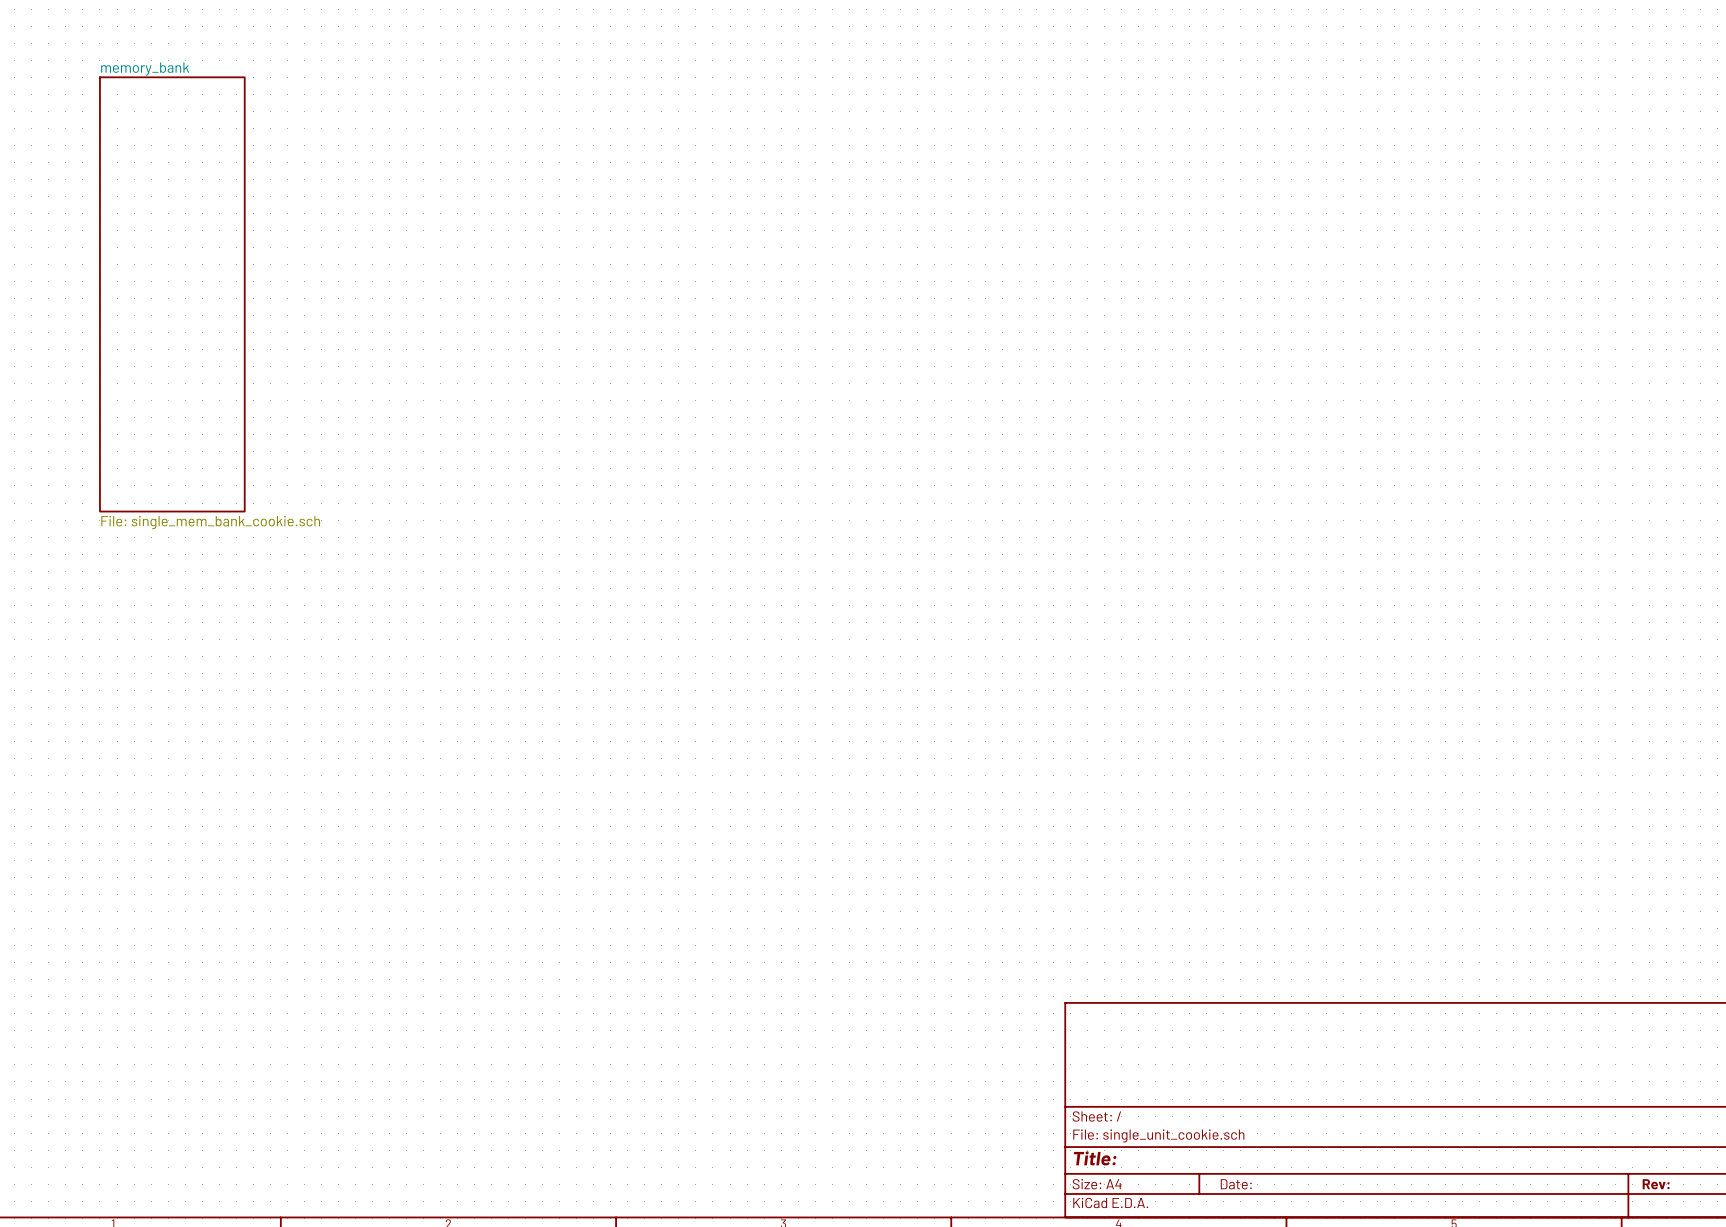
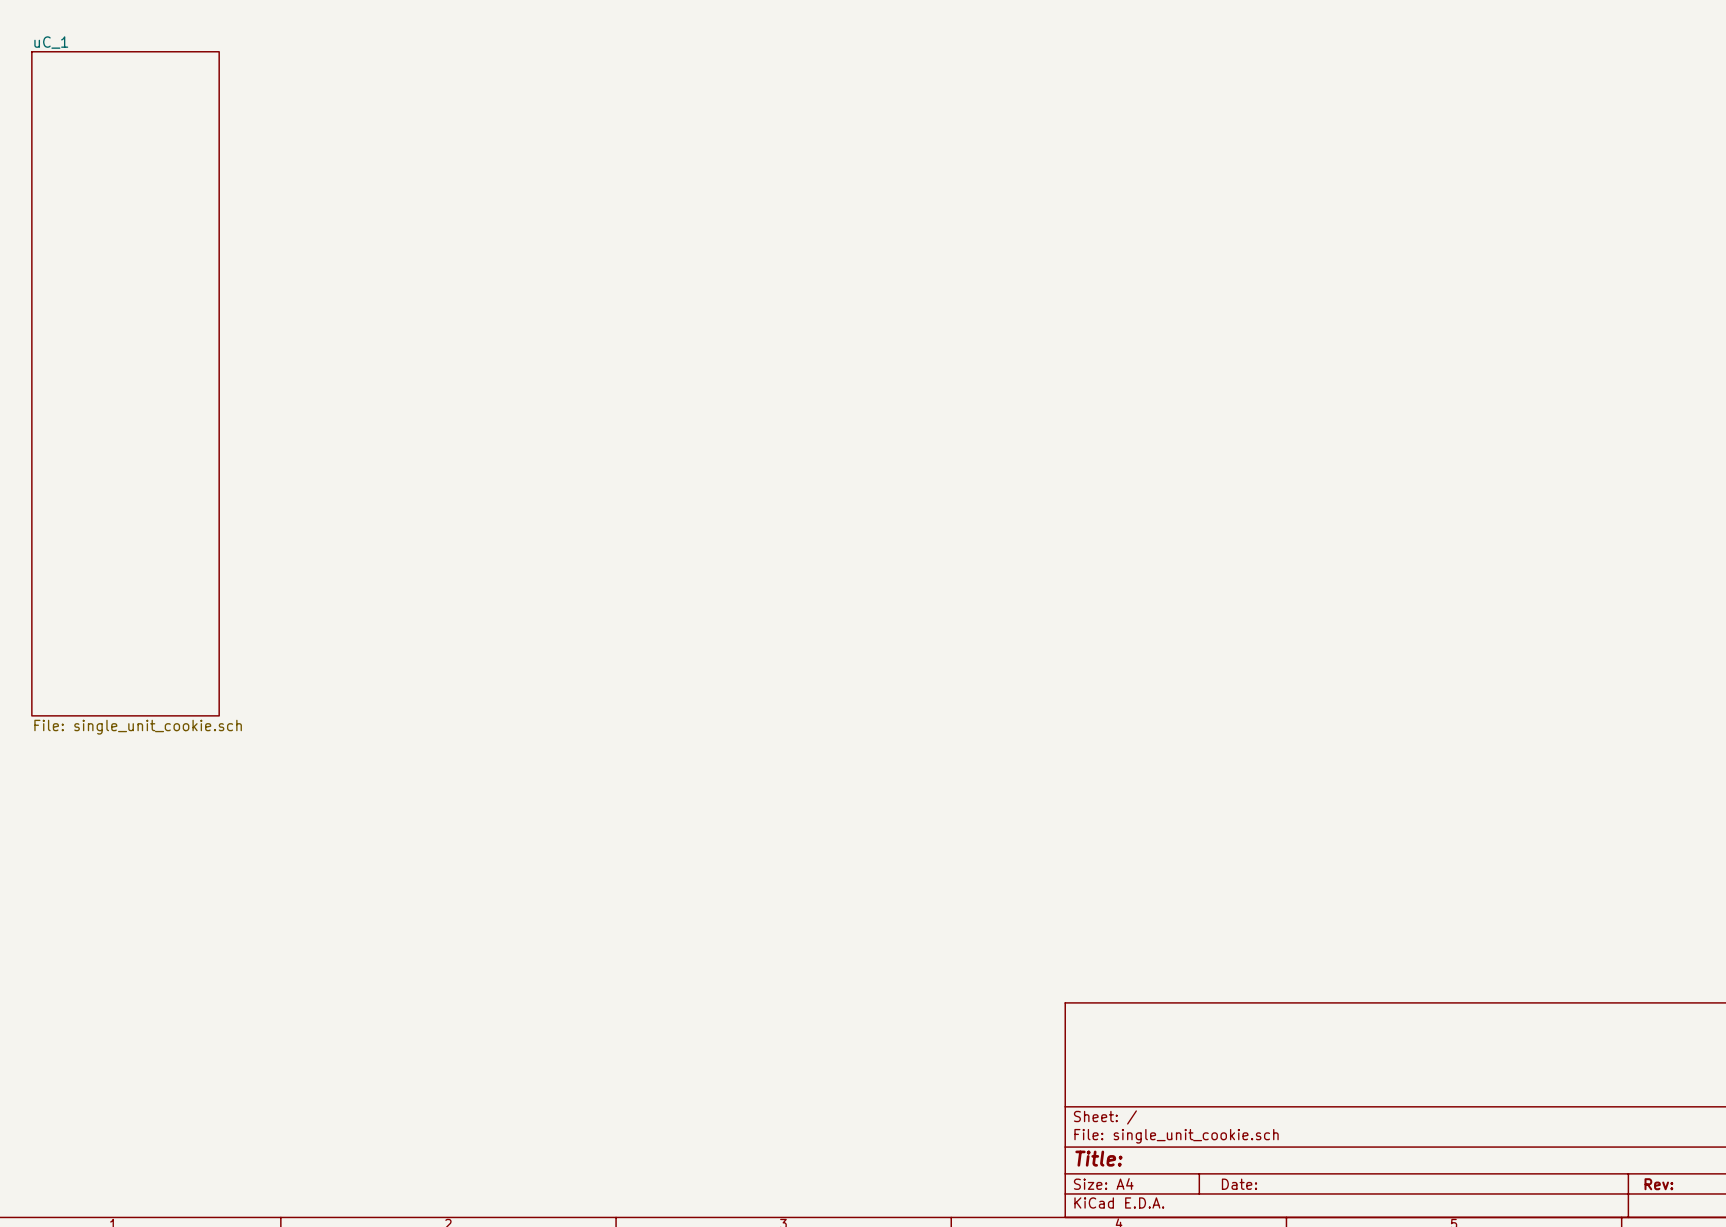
sheet memory_bank: File: single_mem_bank_cookie.sch (172, 294) -> none
sheet uC_1: none -> File: single_unit_cookie.sch (125, 383)

